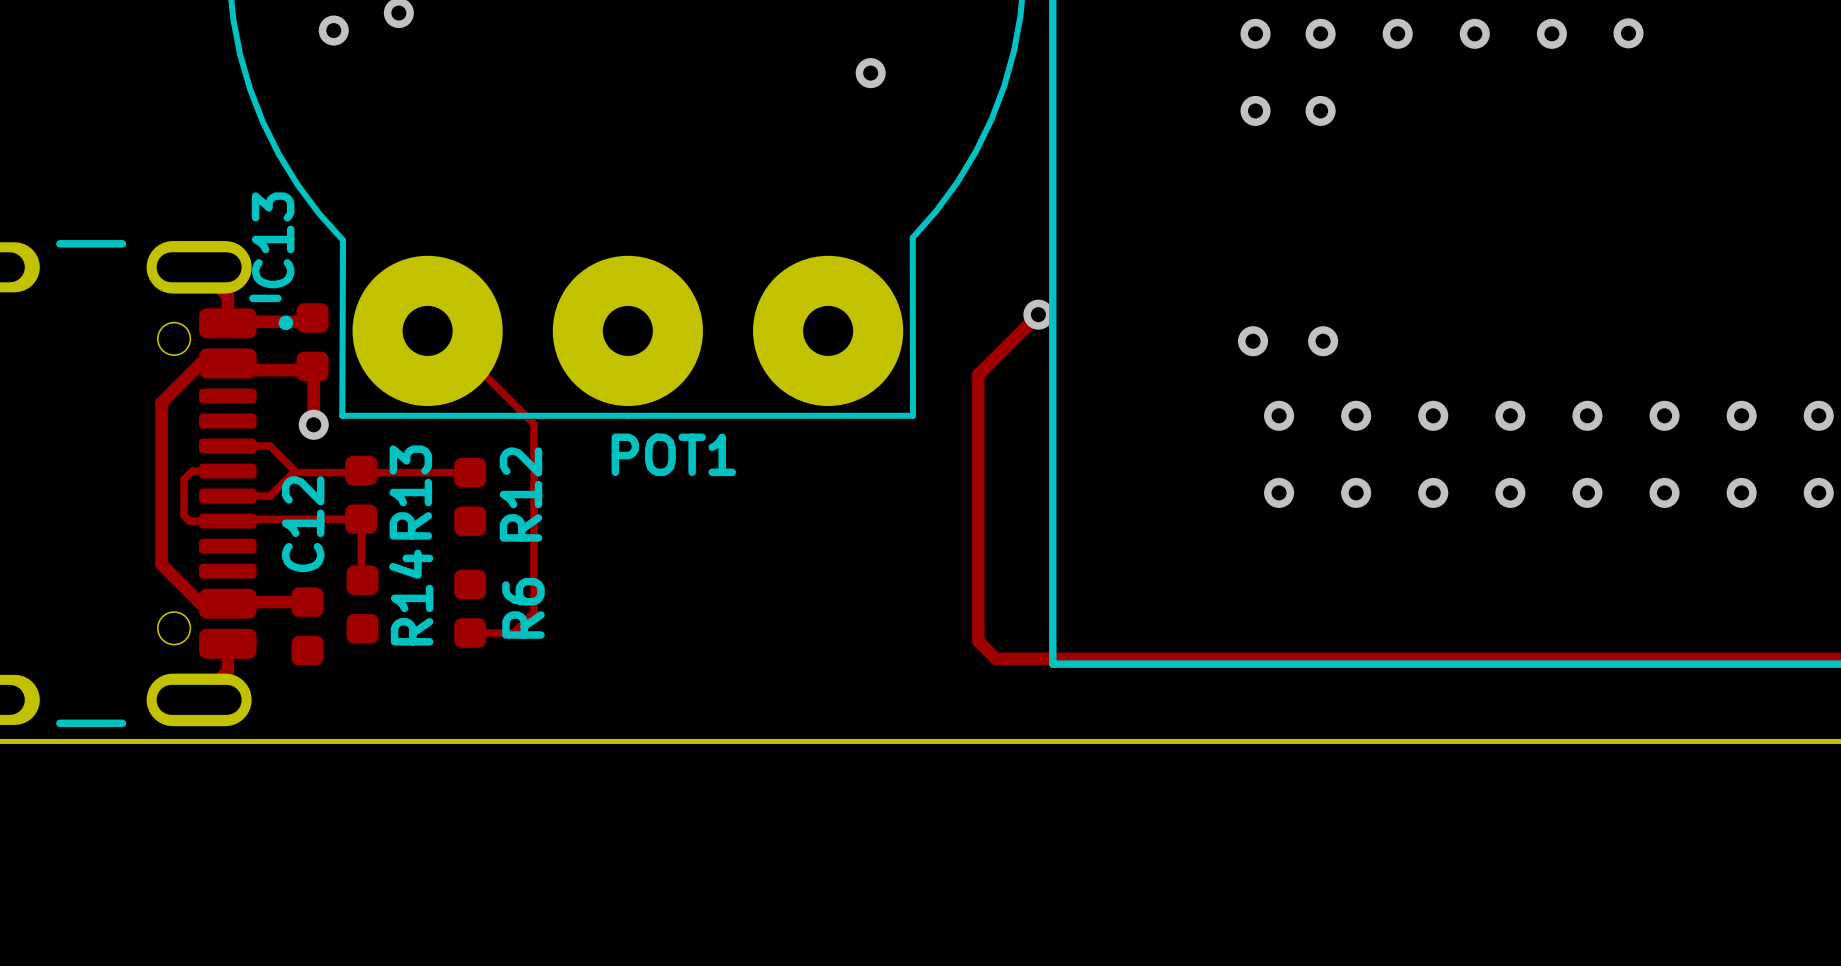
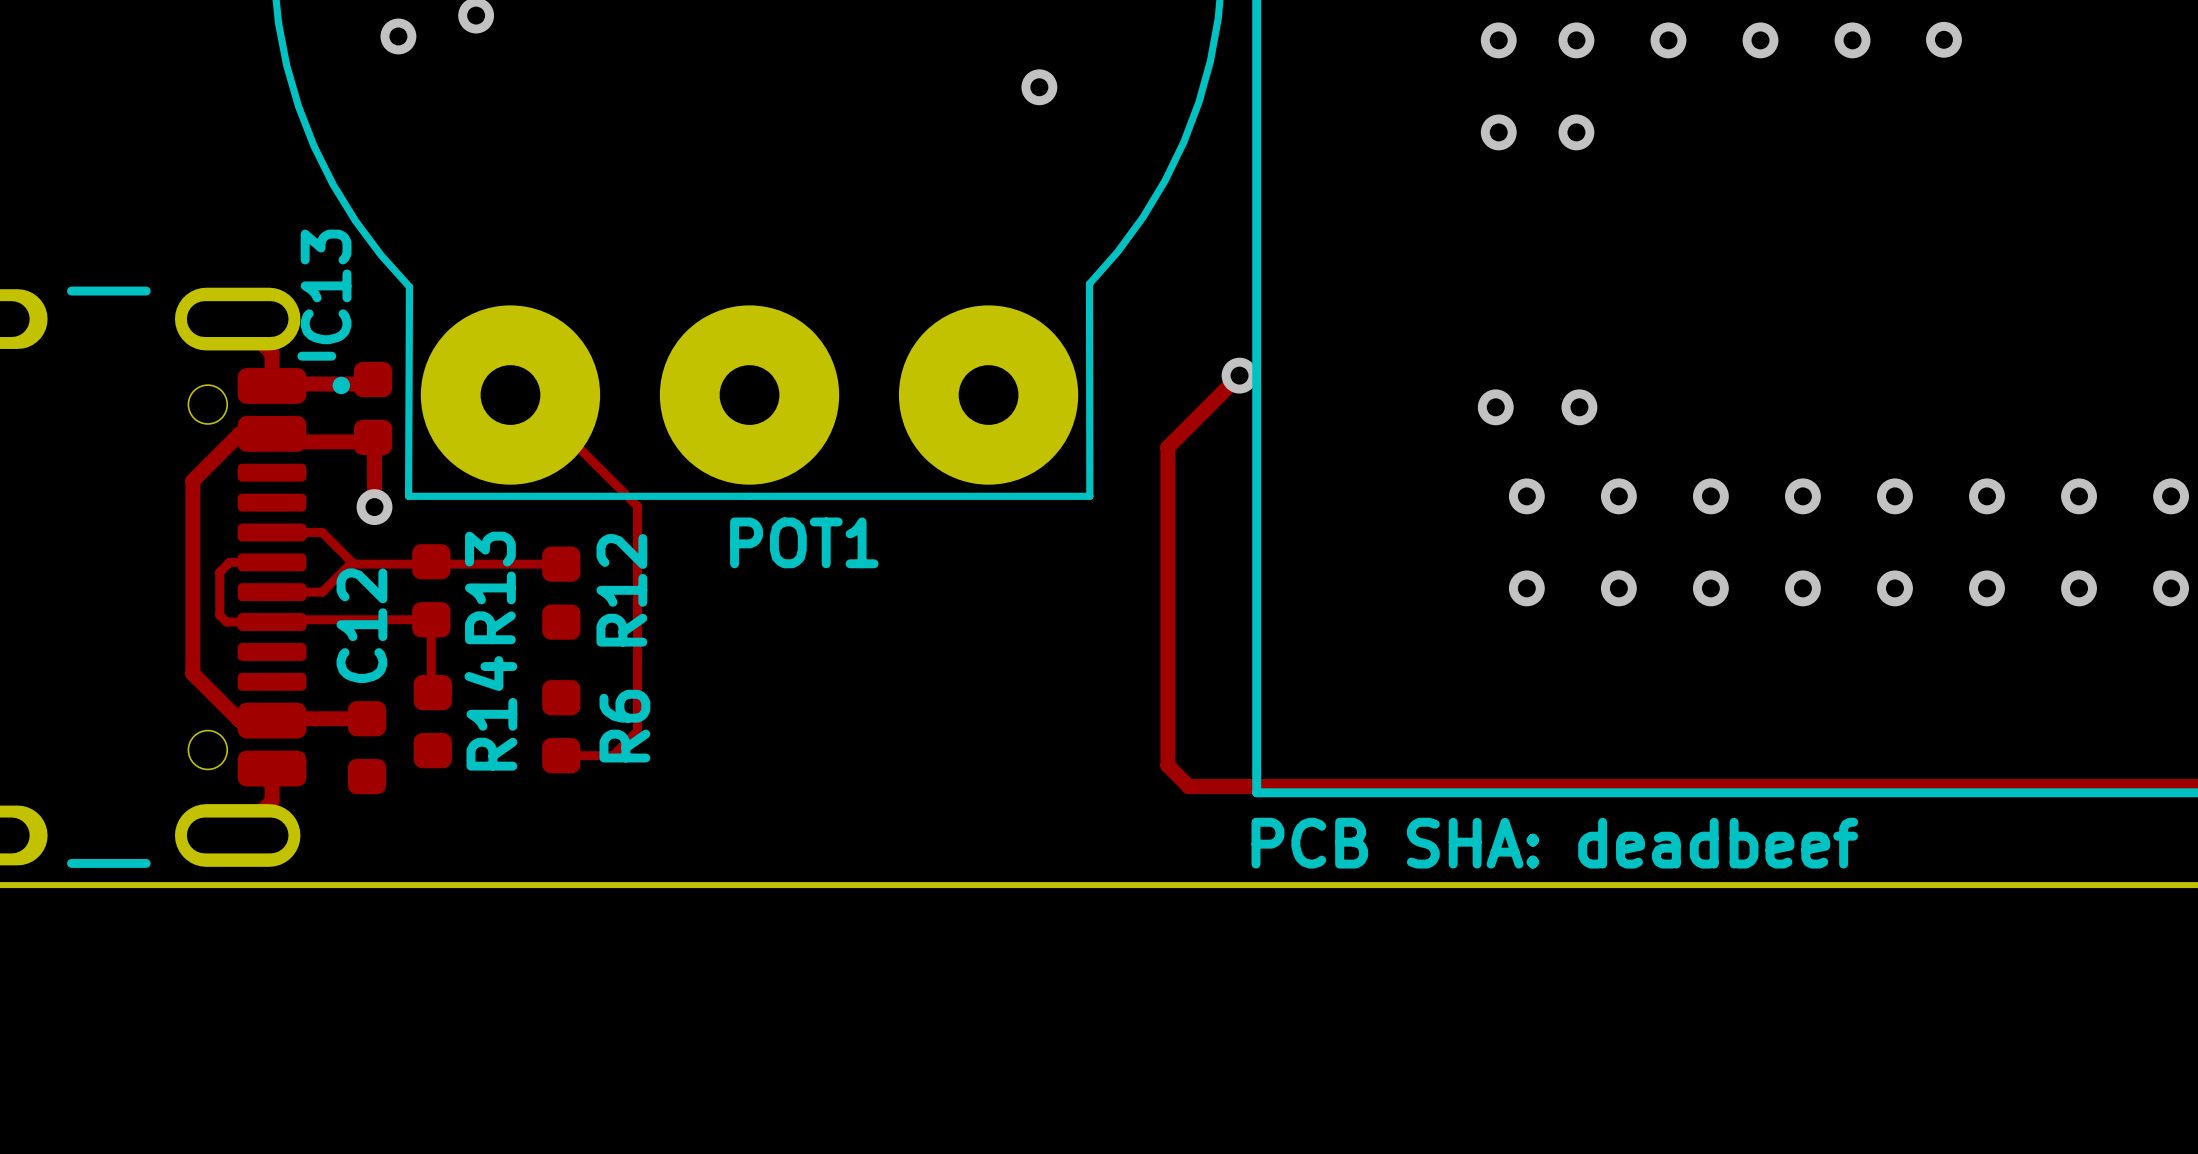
text: none -> PCB SHA: deadbeef (1554, 843)

